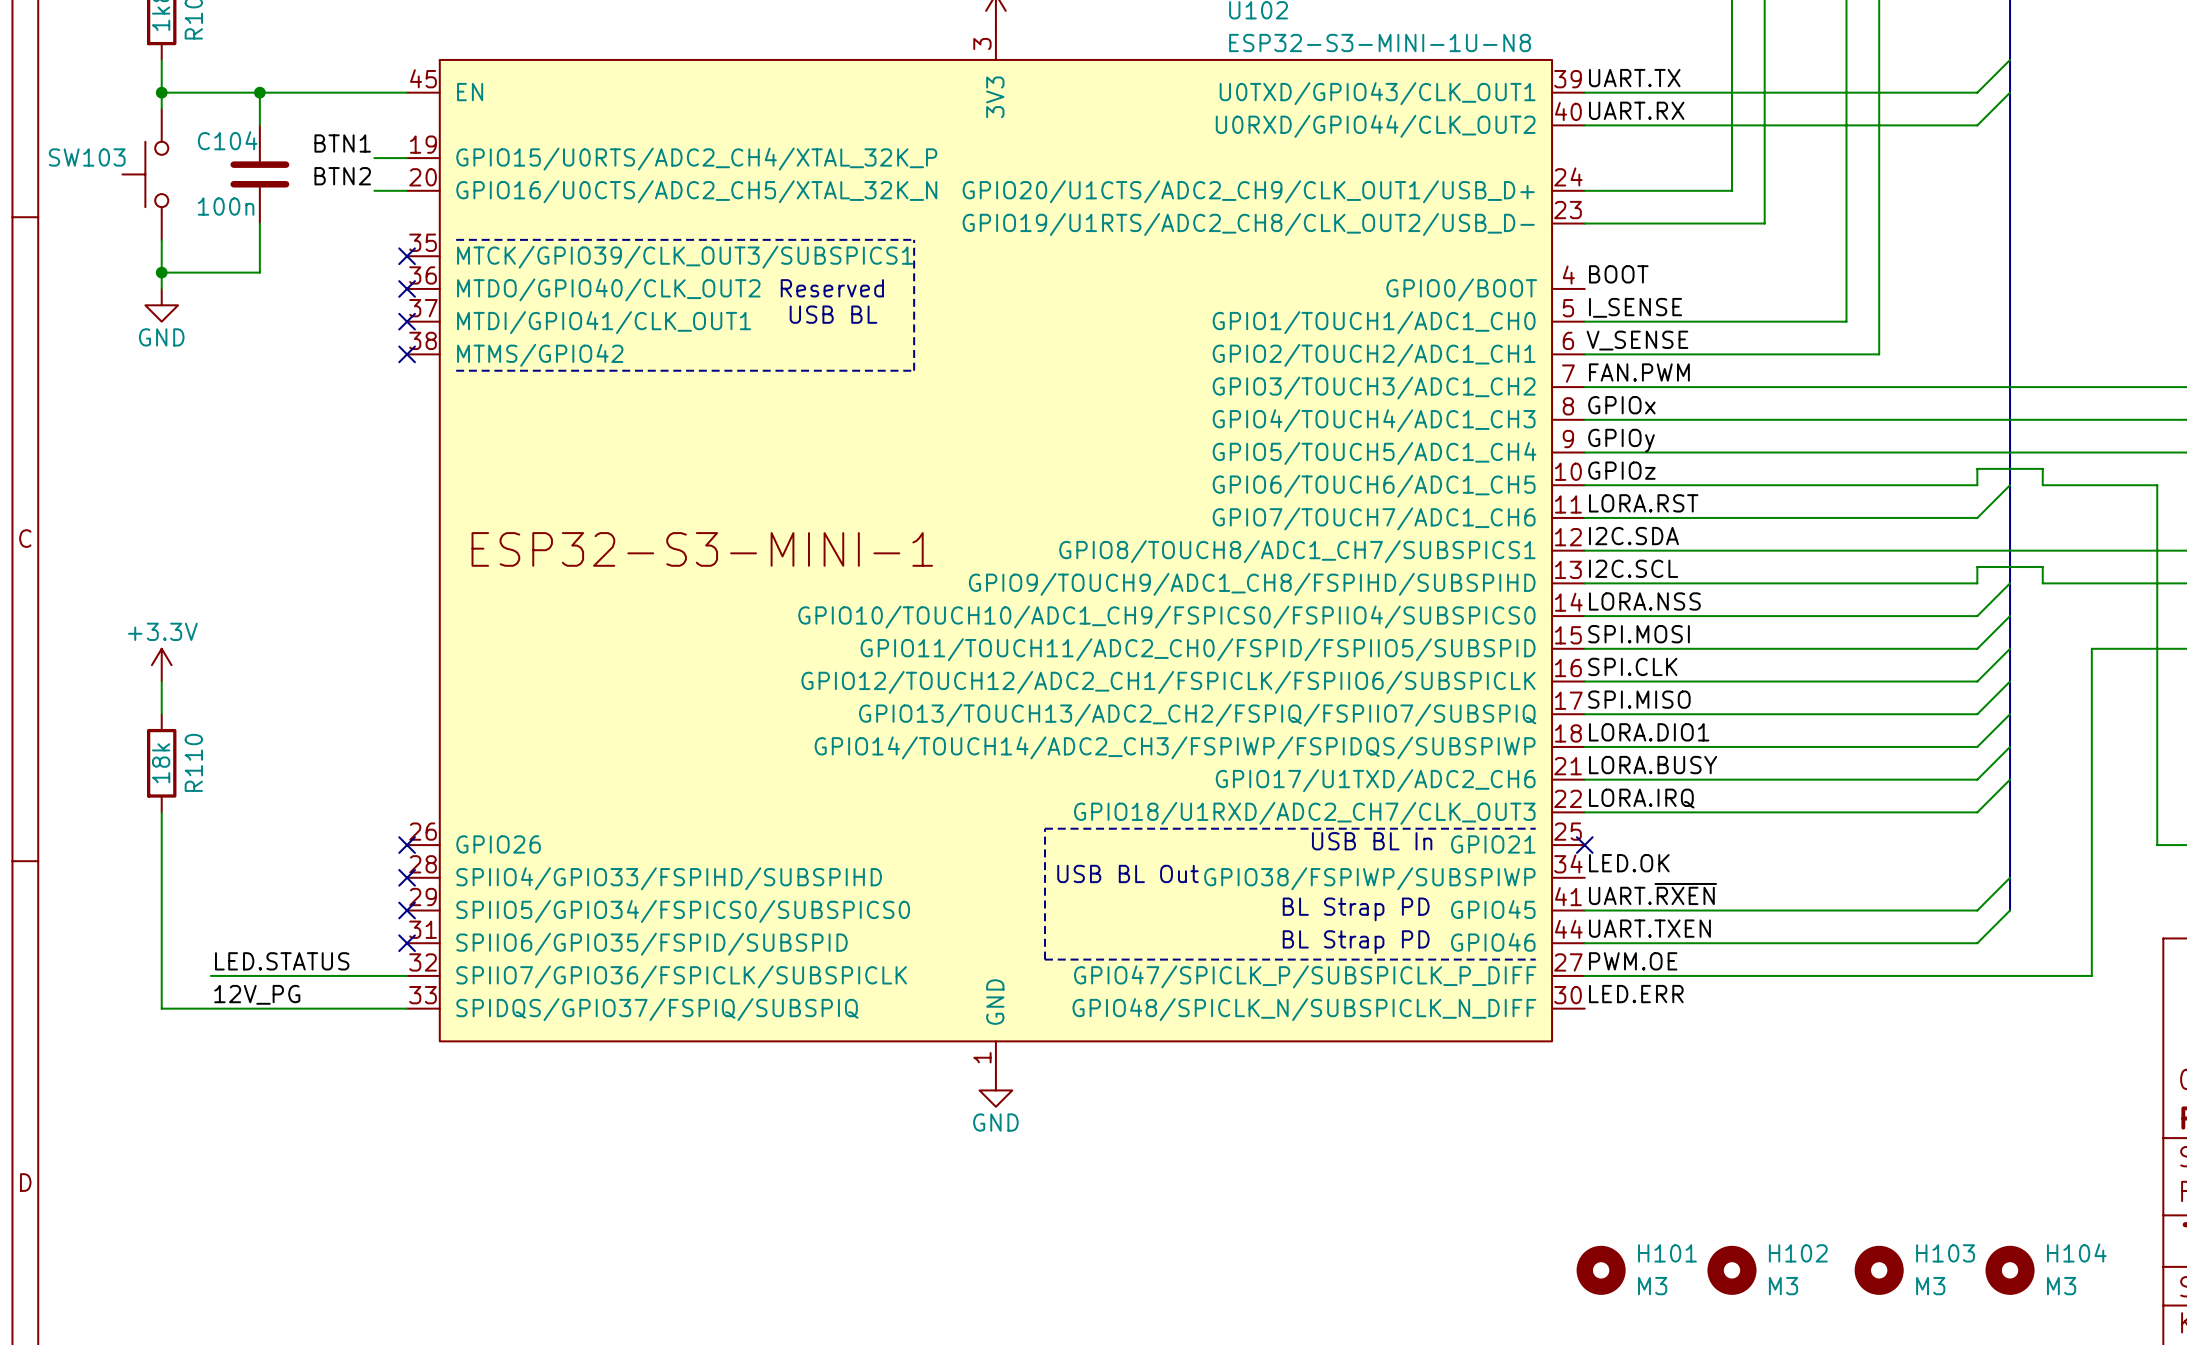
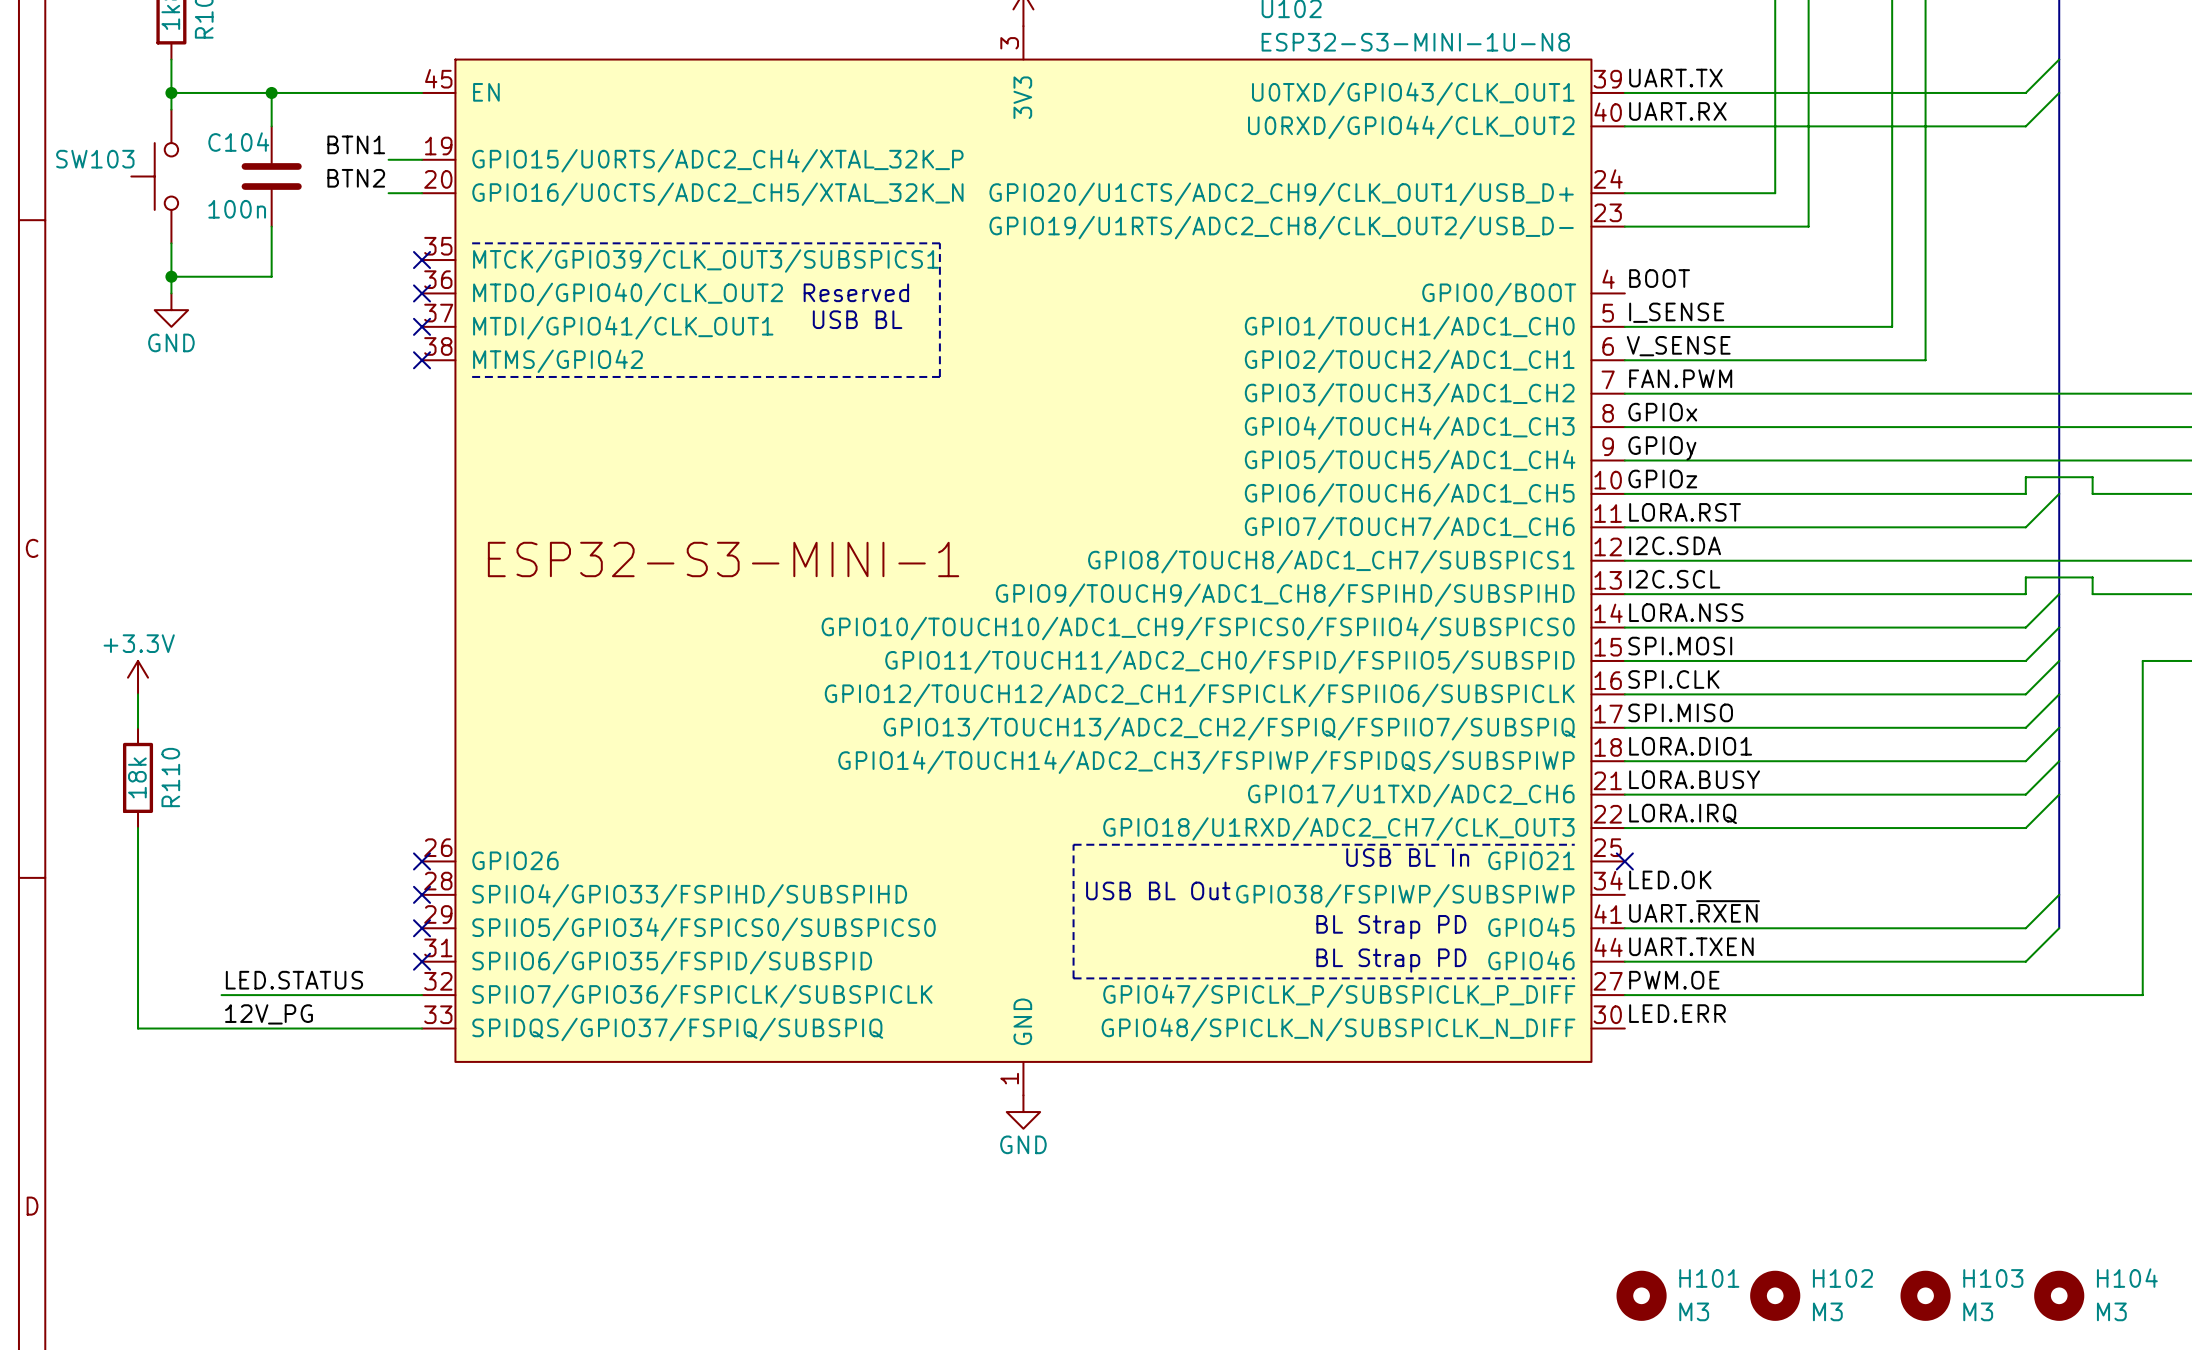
power symbol position: +3.3V (161, 665) -> +3.3V (138, 677)
wire: (161, 681) (161, 714) -> (138, 694) (138, 727)
R110 position: (161, 763) -> (138, 777)
wire: (161, 812) (161, 1008) -> (138, 828) (138, 1028) (171, 1028)

